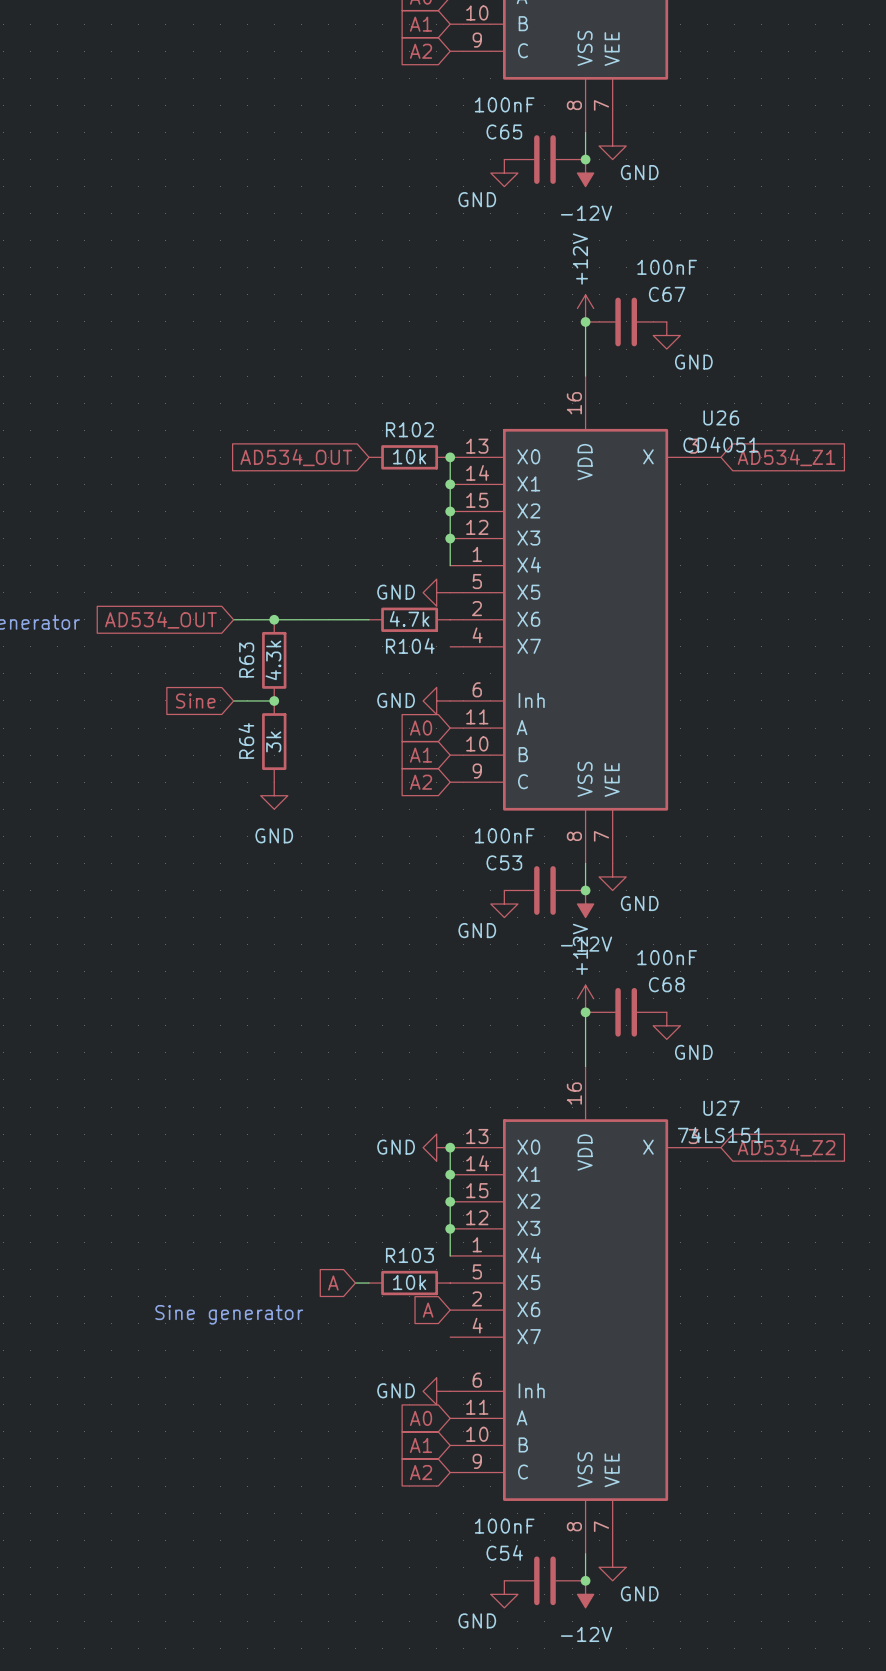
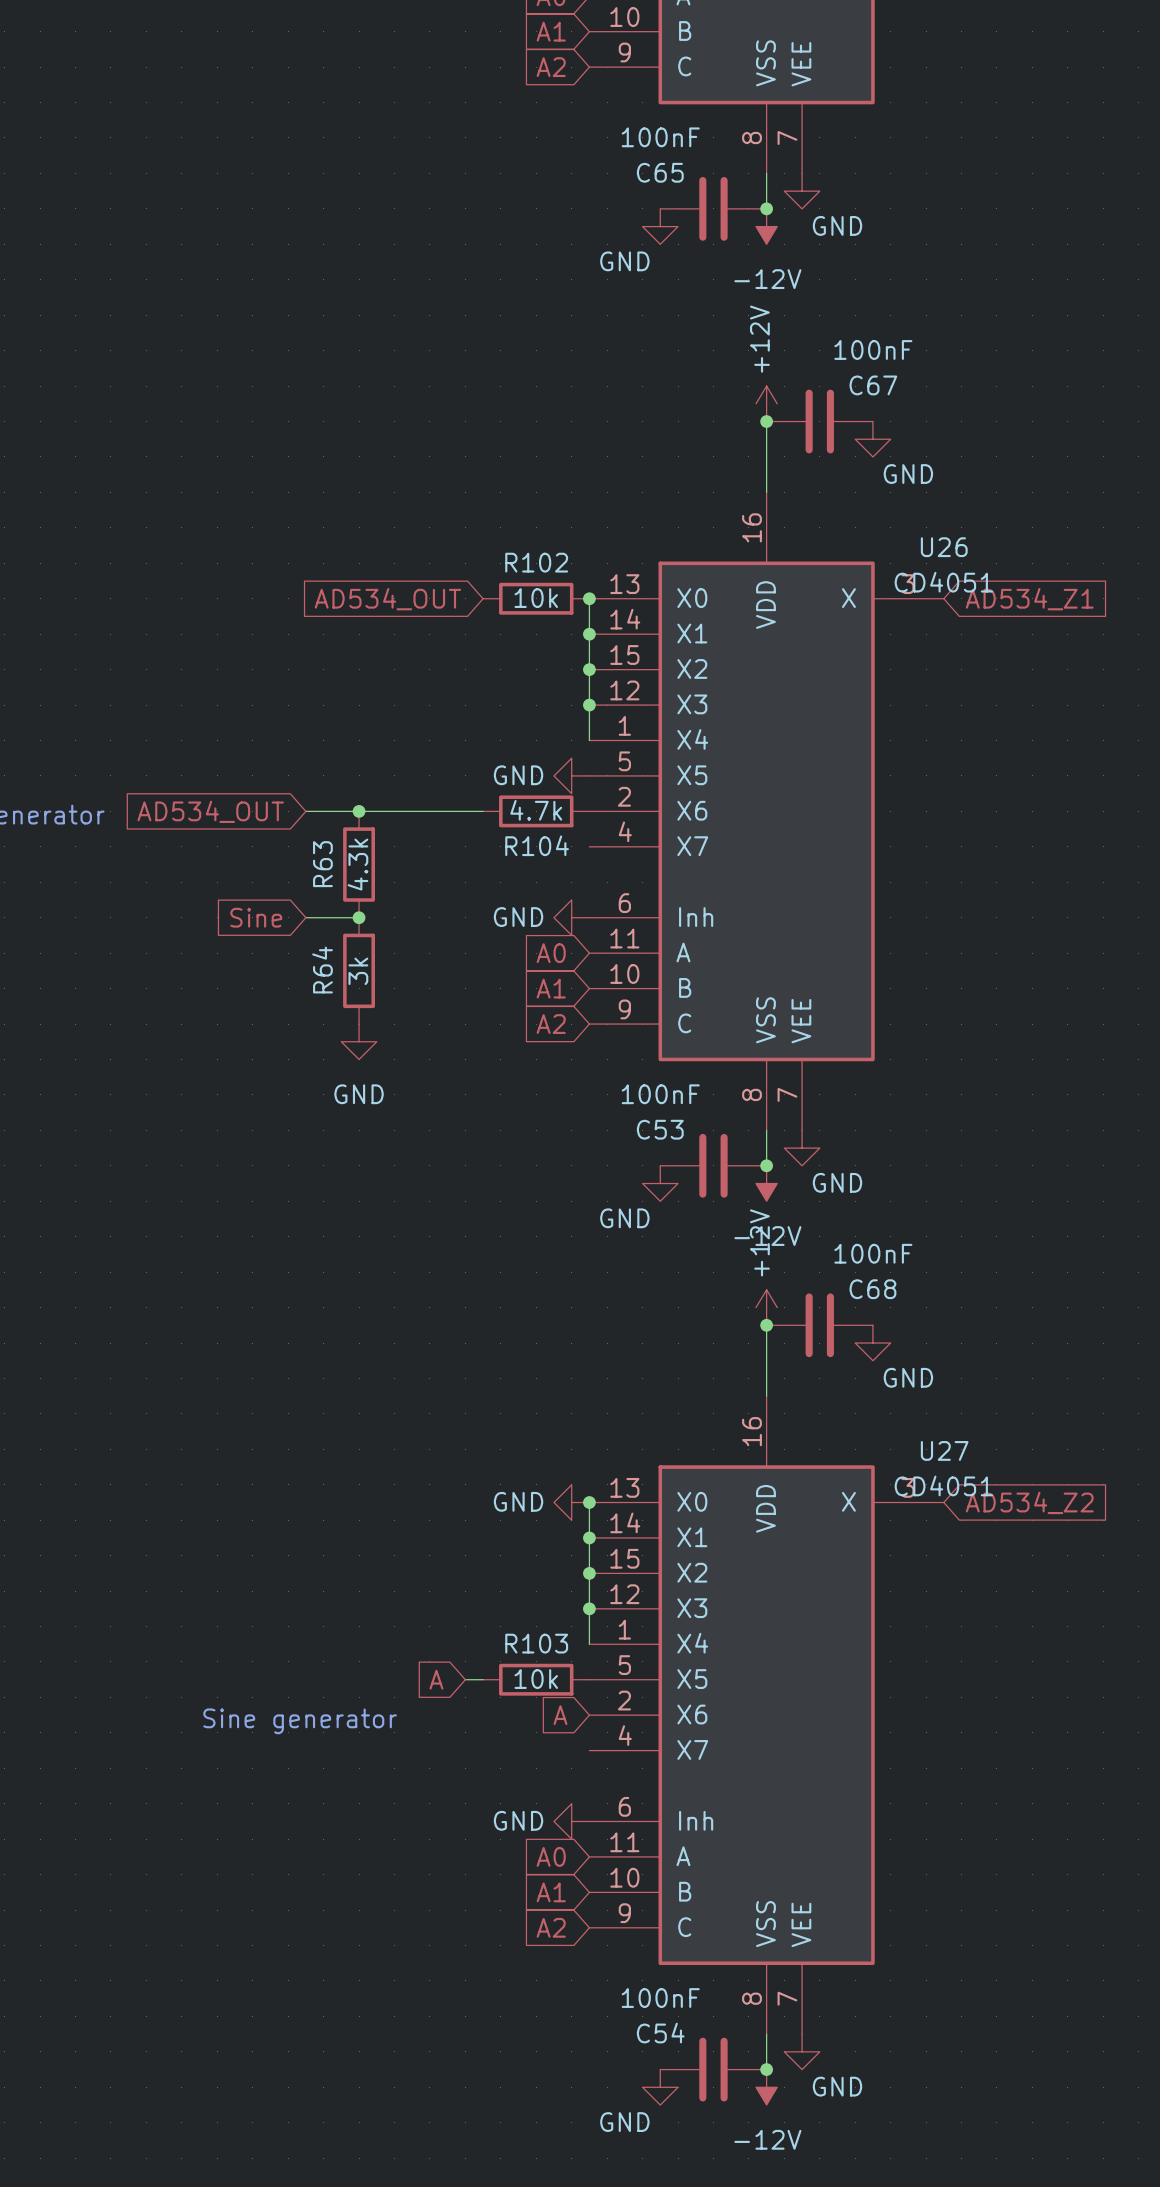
U27 value: 74LS151 (720, 1135) -> CD4051 (943, 1485)

